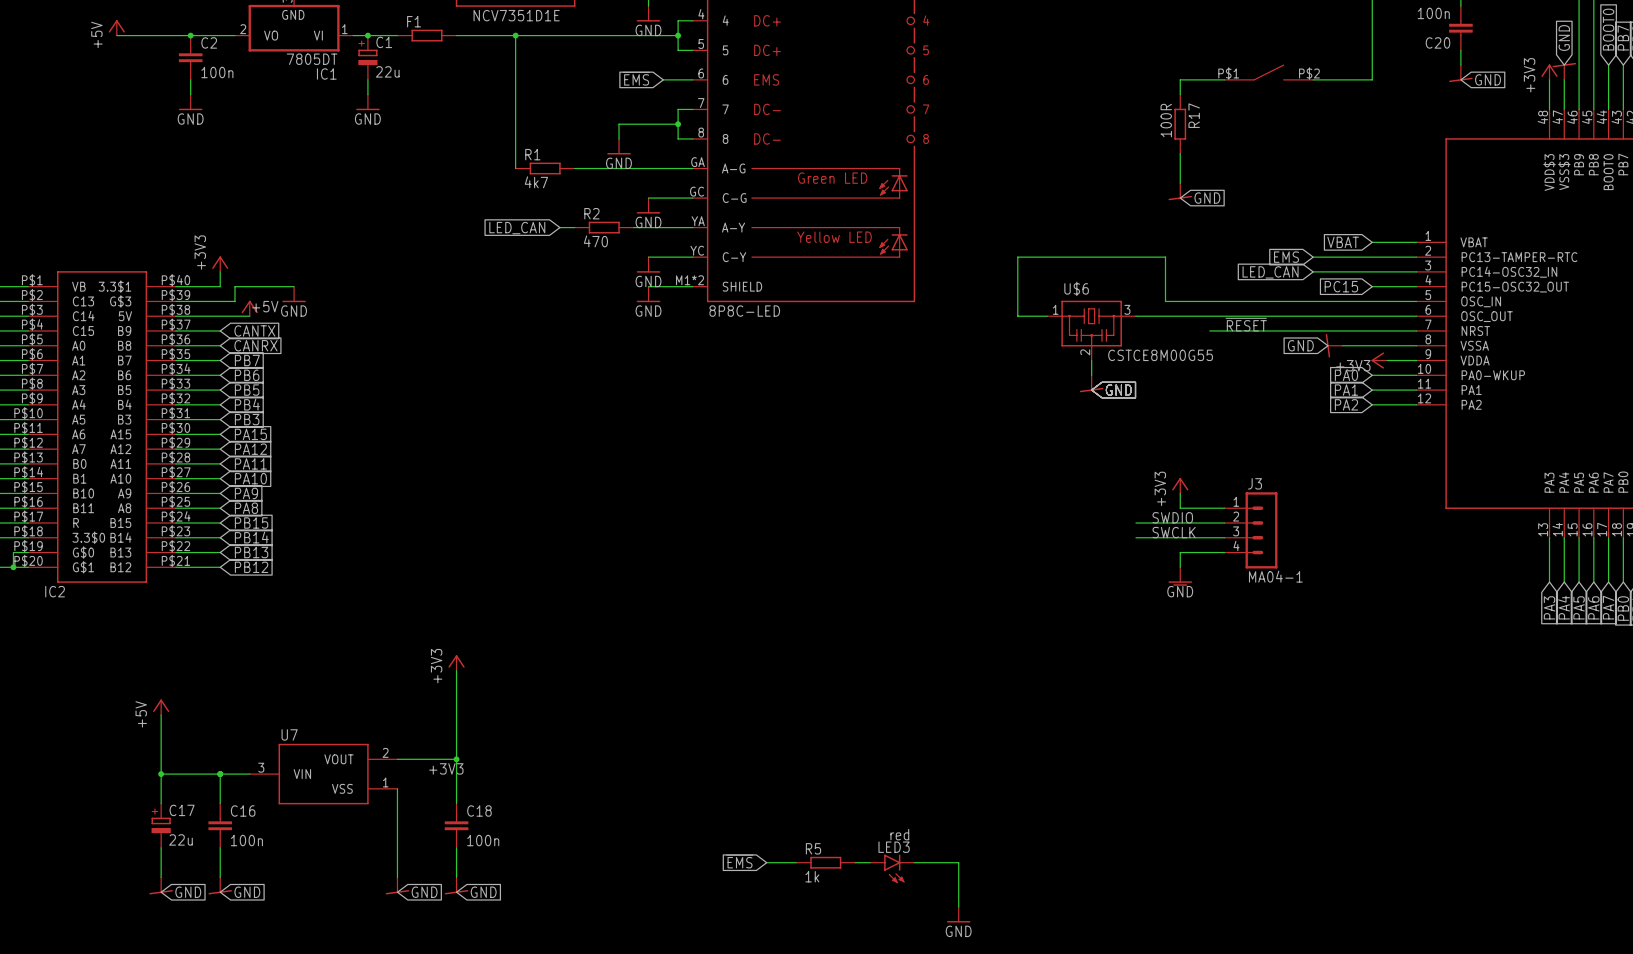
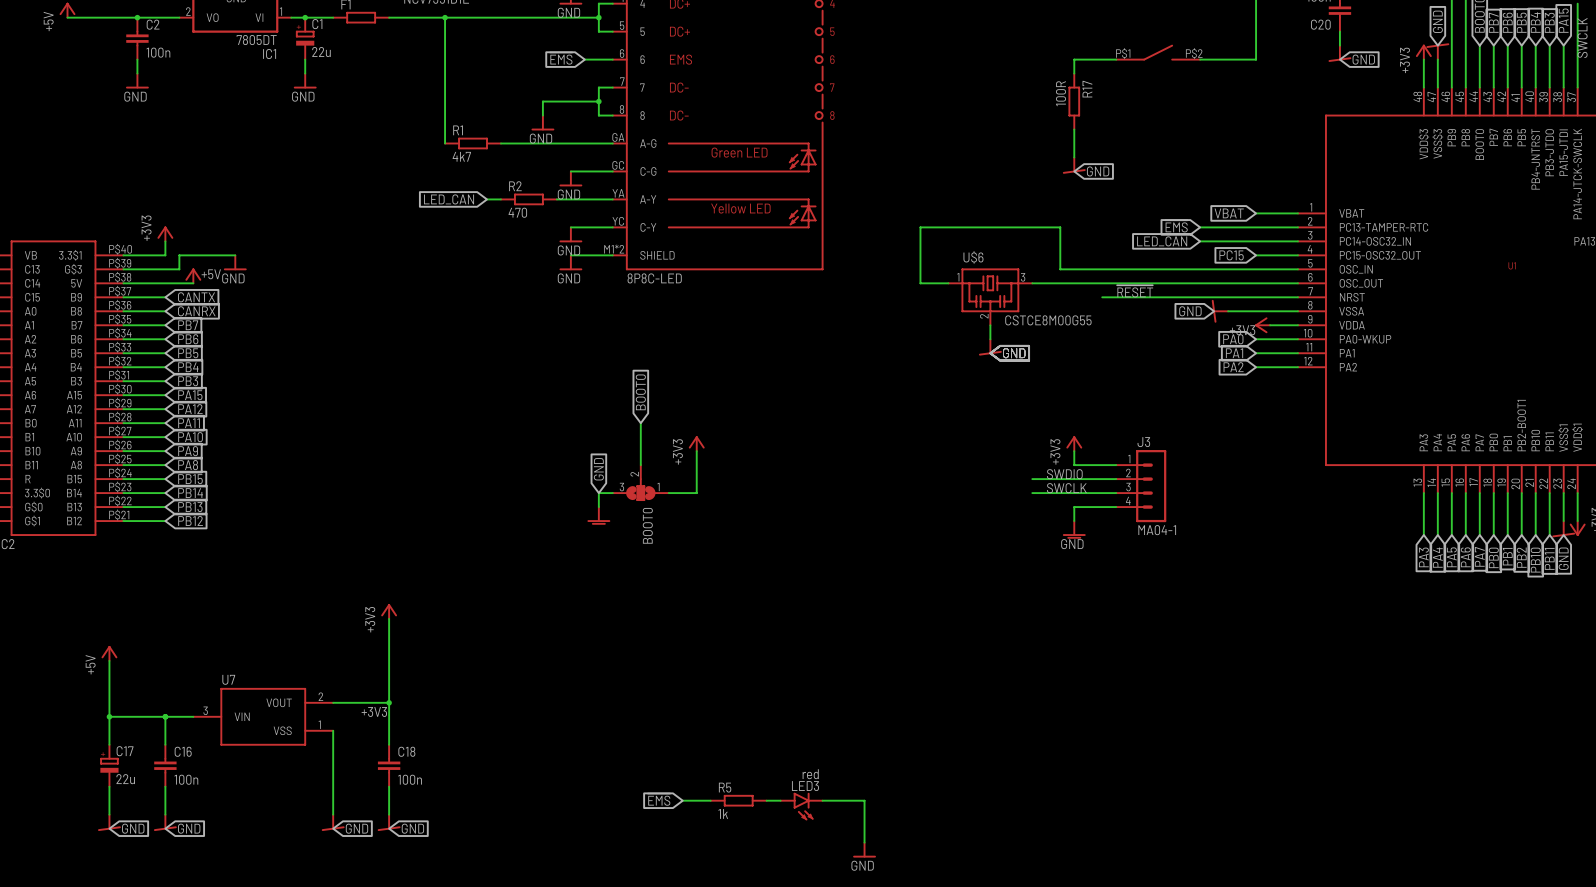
global label: none -> BOOT0 (640, 392)
wire: none -> (640, 423) (640, 465)
power symbol: none -> +3V3 (696, 443)
wire: none -> (696, 451) (696, 493) (668, 493)
global label: none -> GND (598, 469)
BOOT0: none -> (640, 482)
wire: none -> (612, 493) (598, 493) (598, 507)
power symbol: none -> (598, 515)

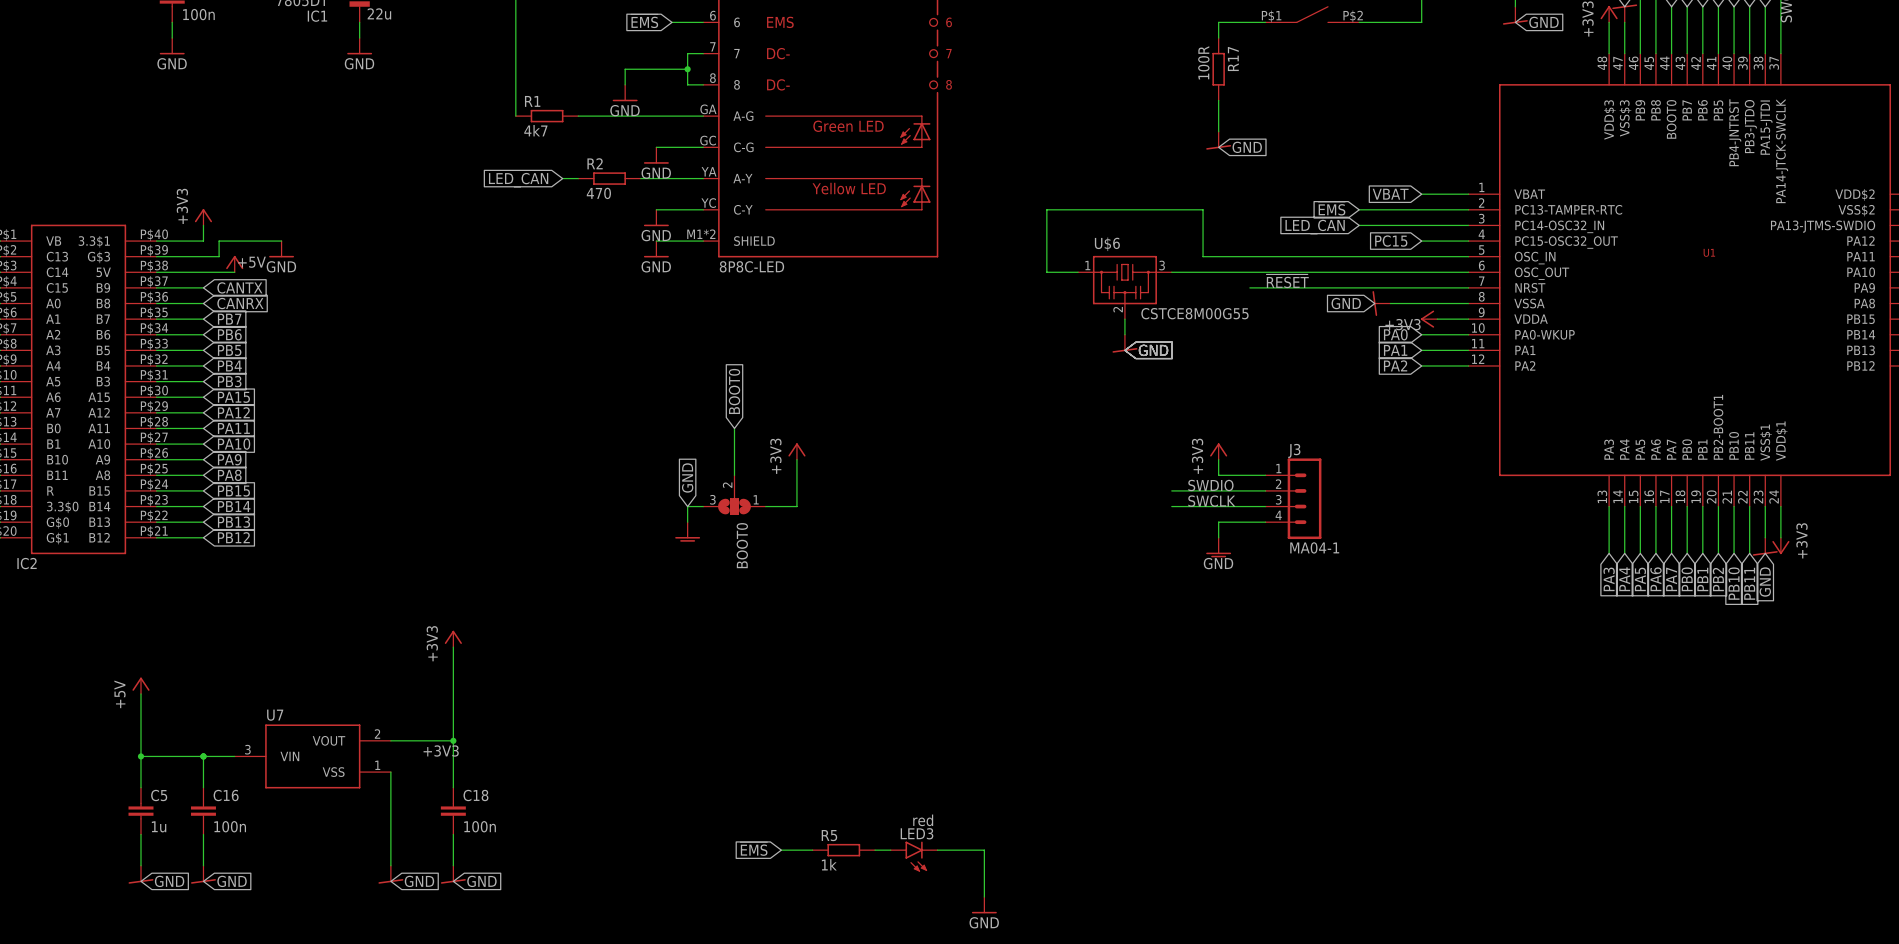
C17: 22u (109, 765) -> none
C5: none -> 1u (141, 811)

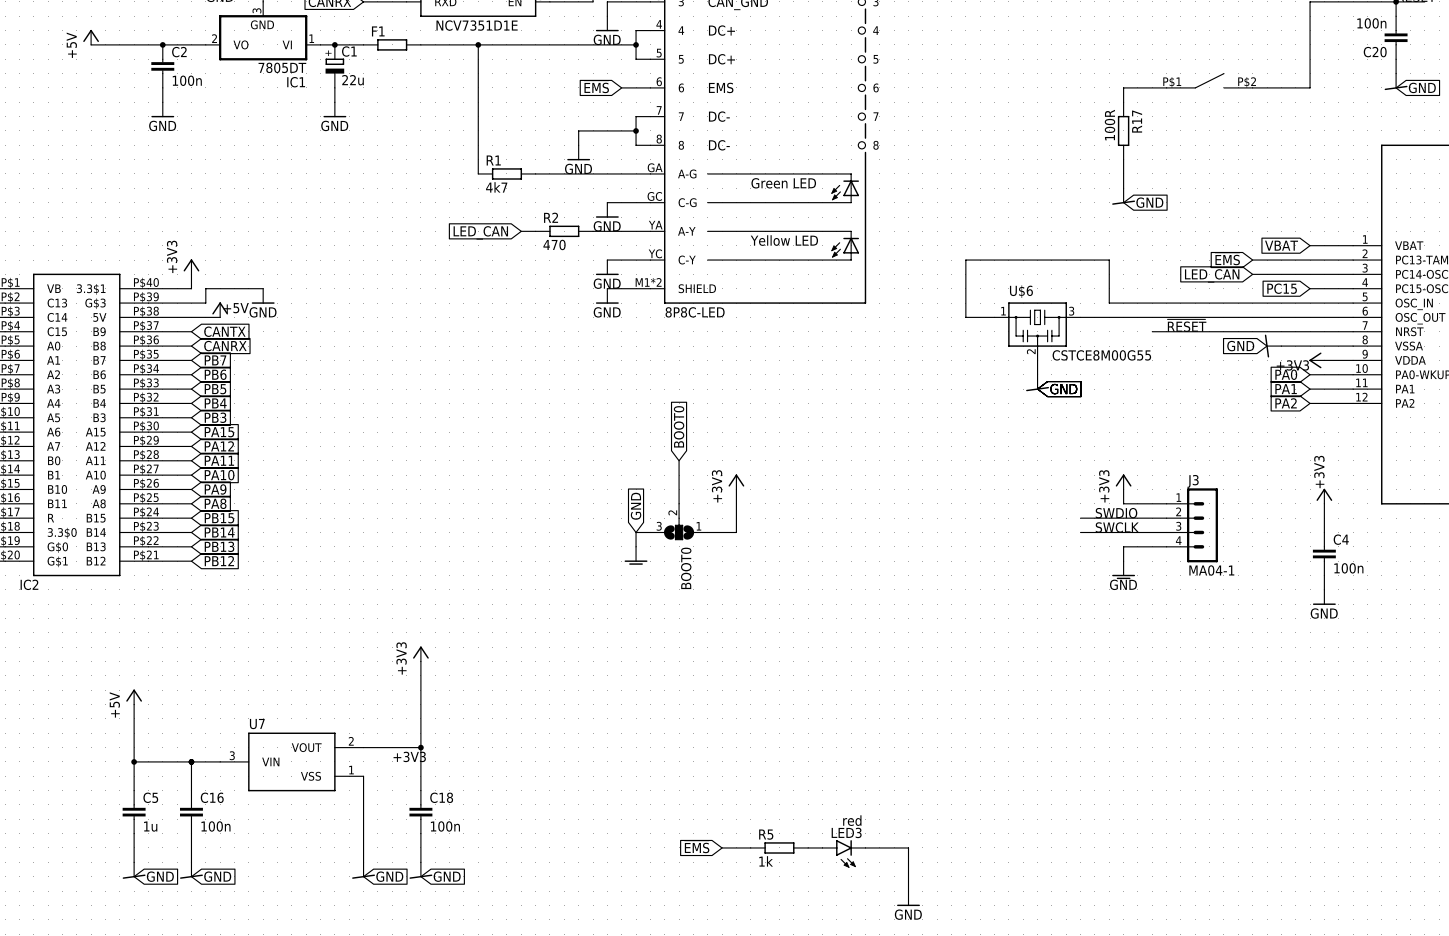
power symbol: none -> +3V3 (1324, 496)
wire: none -> (1324, 503) (1324, 532)
C4: none -> 100n (1324, 554)
wire: none -> (1324, 575) (1324, 589)
power symbol: none -> GND (1324, 597)

